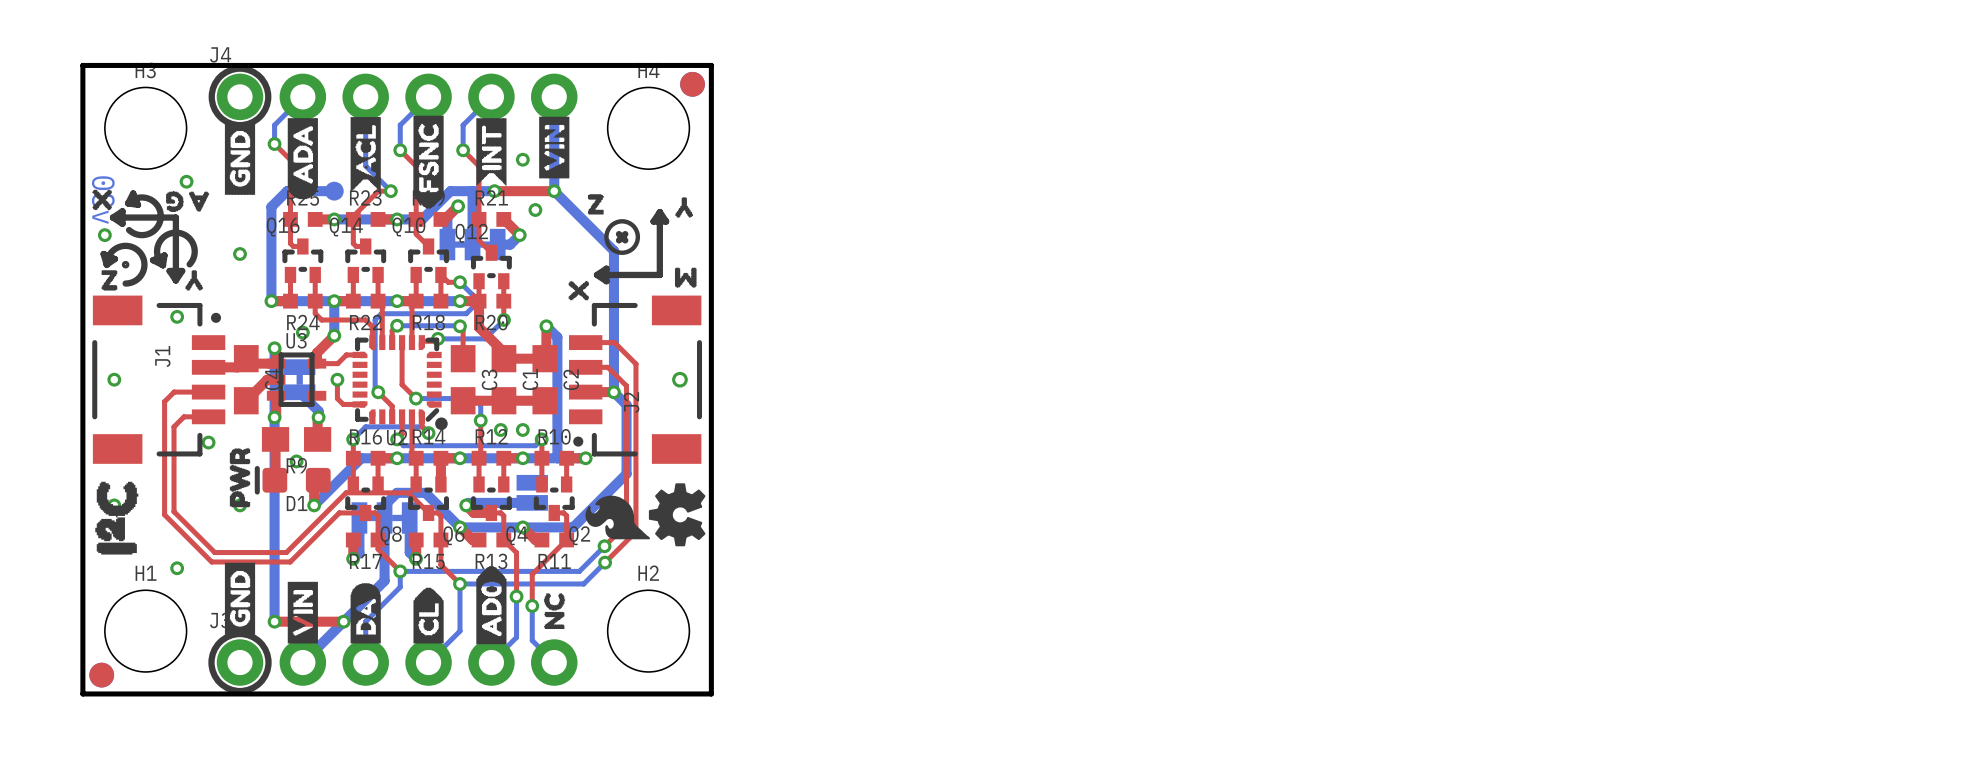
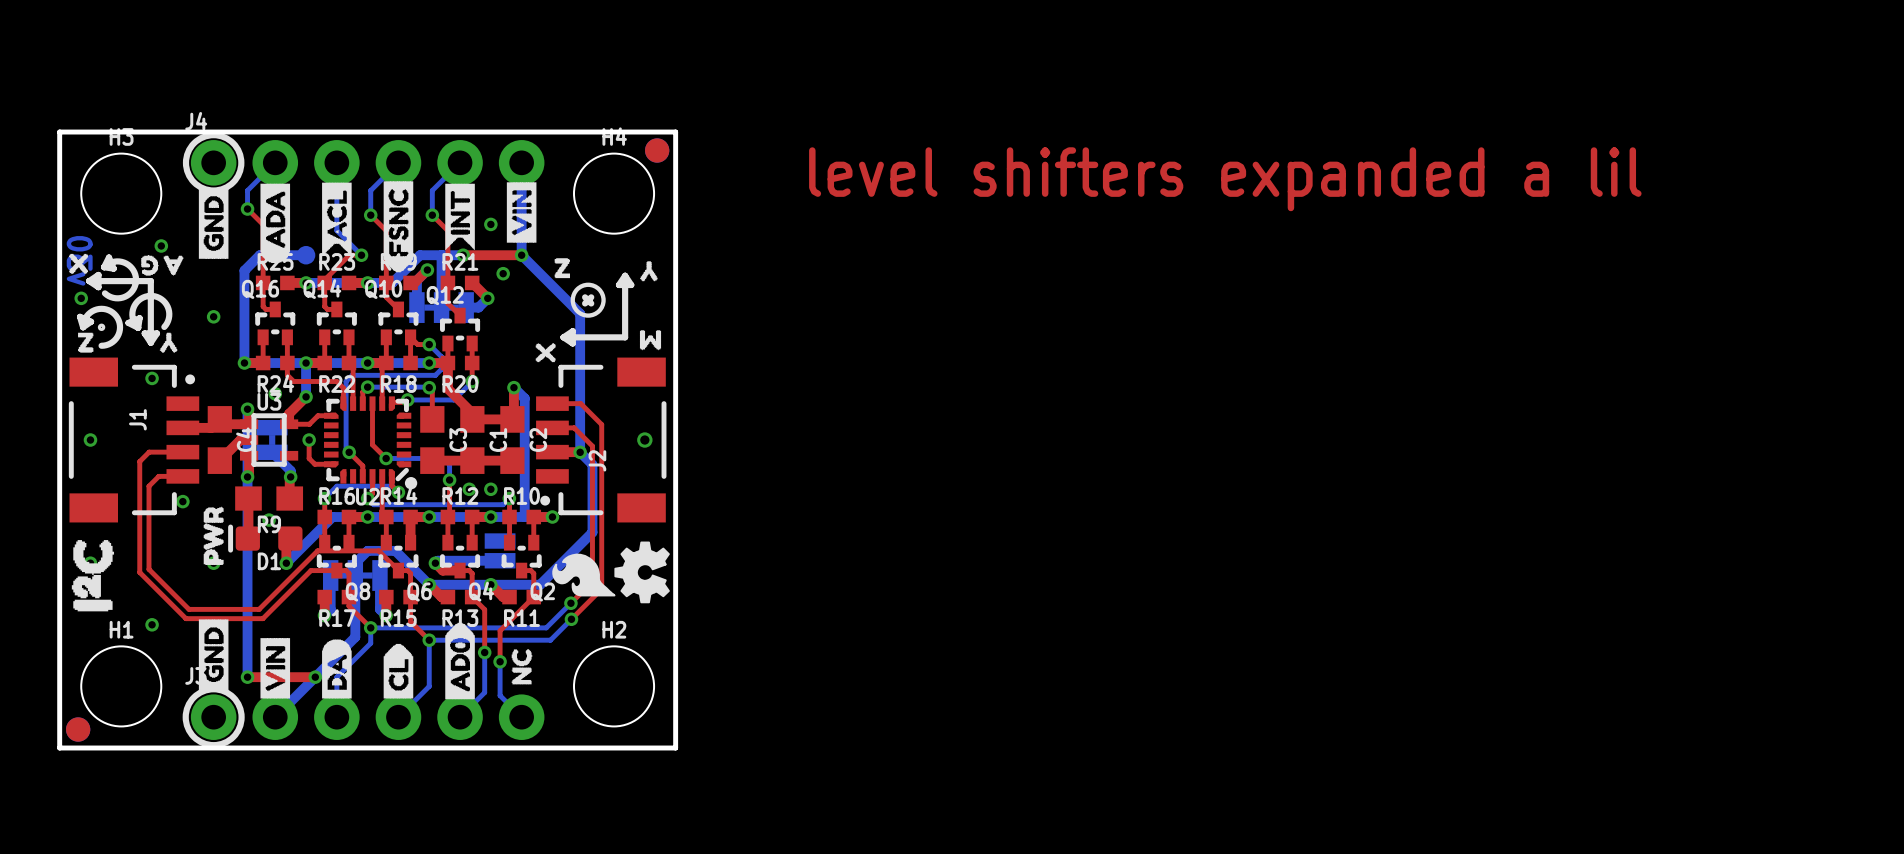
text: none -> level shifters expanded a lil (1225, 179)

